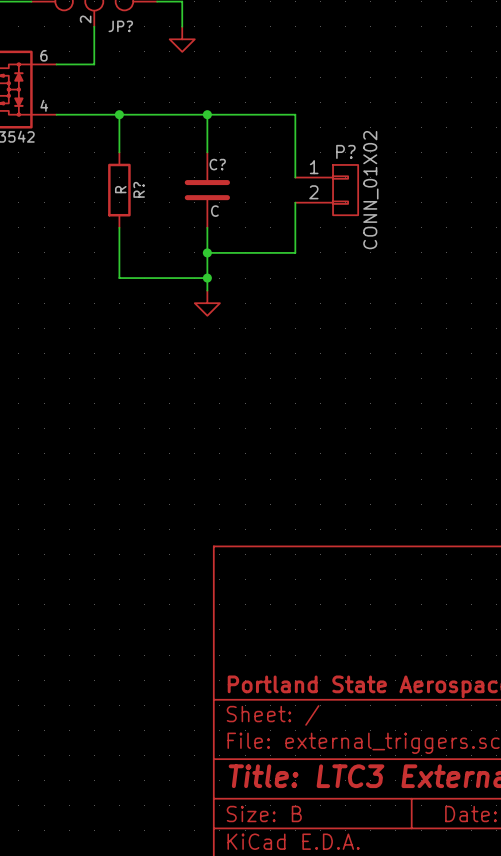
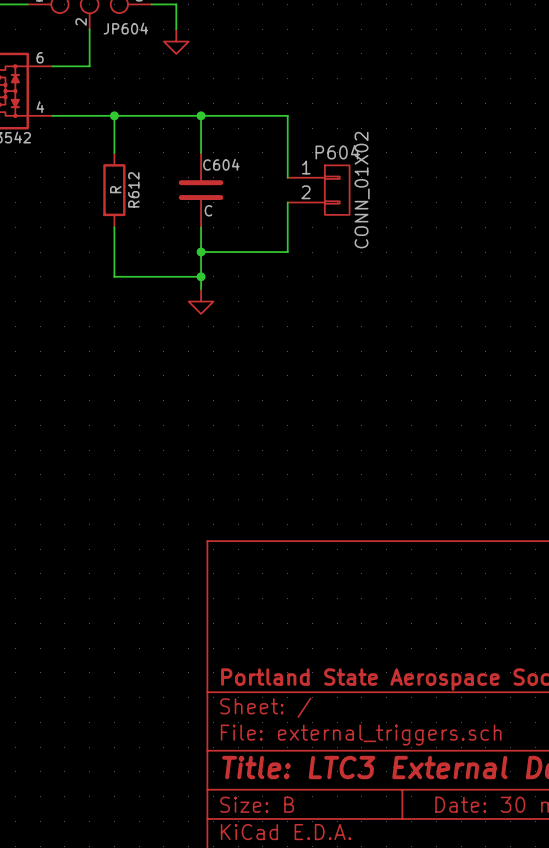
JP? name: JP? (120, 26) -> JP604 (125, 28)
P? name: P? (345, 151) -> P604 (337, 152)
C? name: C? (217, 164) -> C604 (221, 164)
R? name: R? (139, 189) -> R612 (133, 189)

